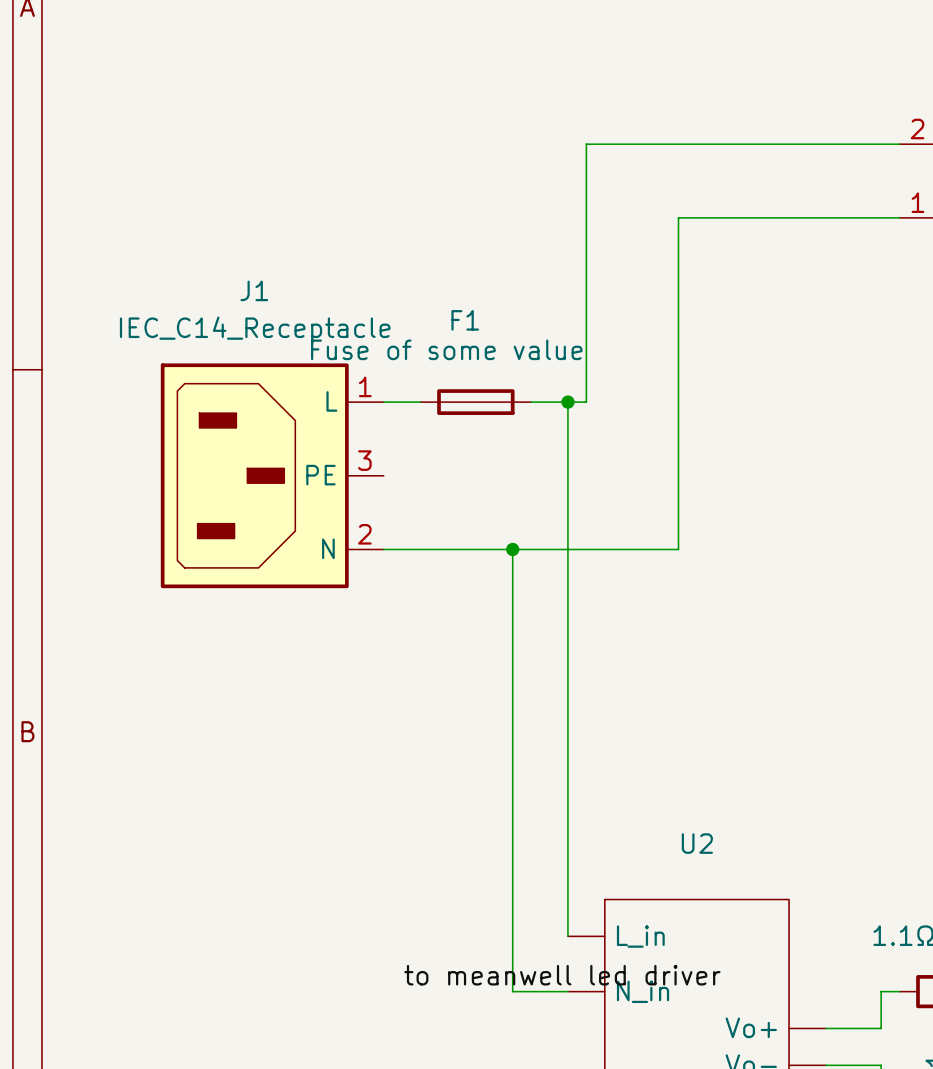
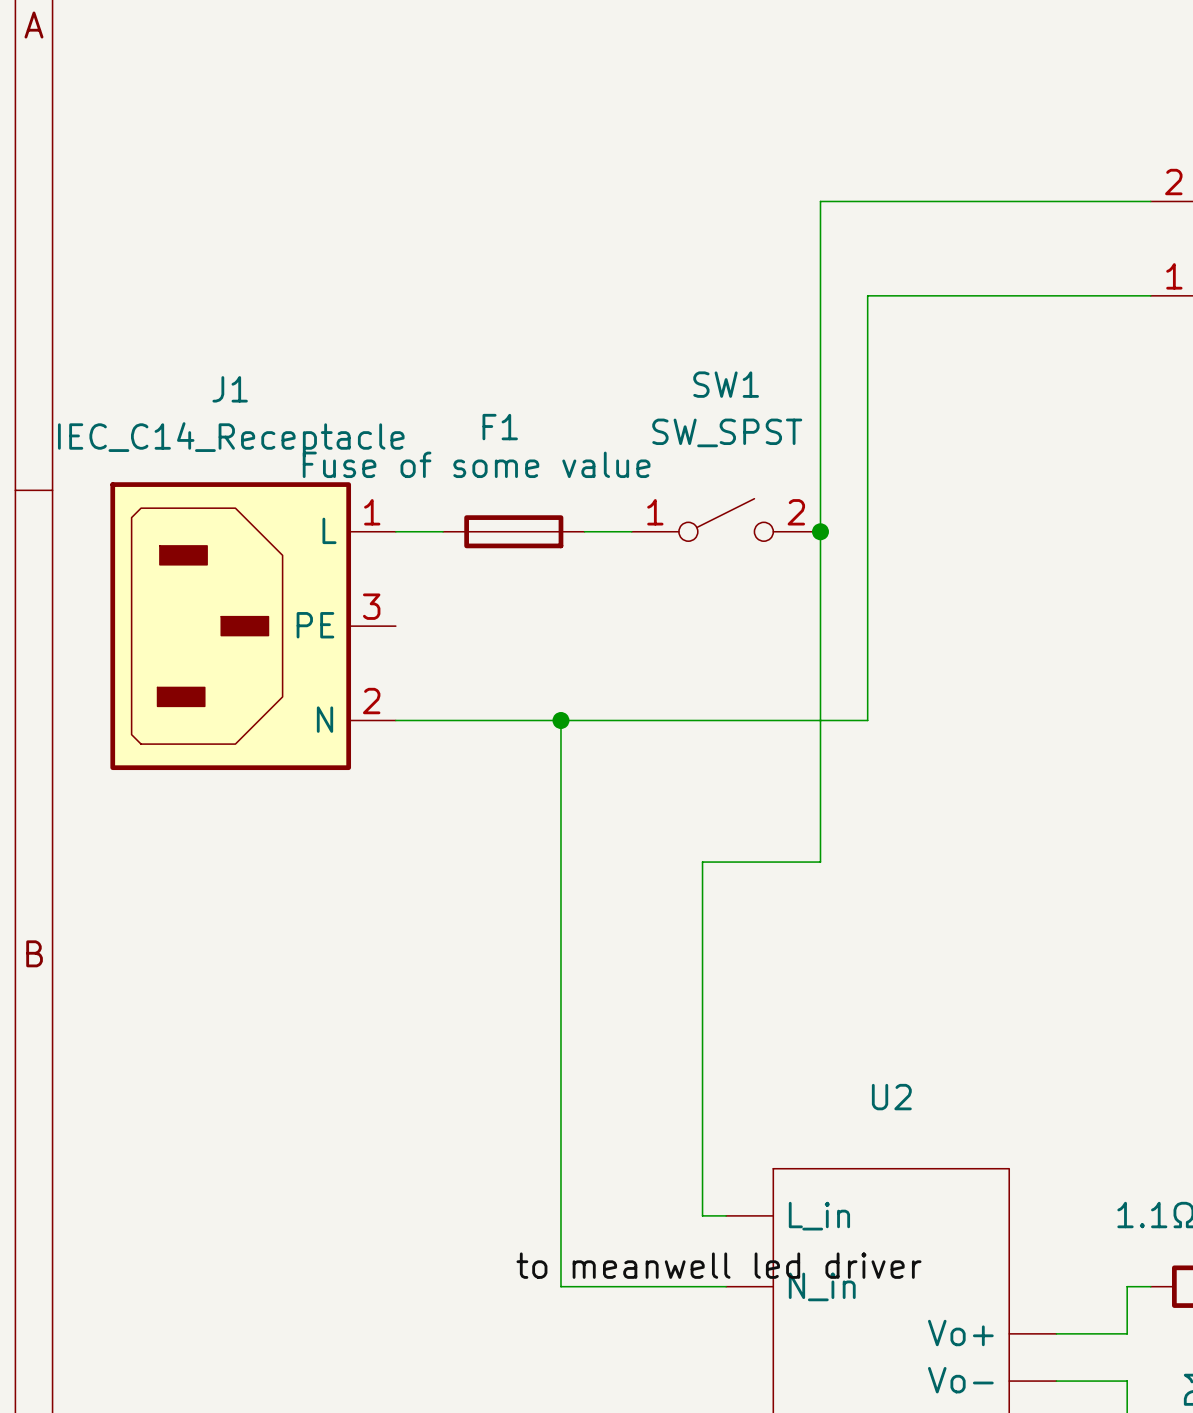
wire: (641, 144) (586, 144) (586, 402) (531, 402) -> none
SW1: none -> SW_SPST (726, 519)
F1 position: (475, 402) -> (513, 531)
wire: (567, 402) (567, 936) -> (820, 201) (820, 862) (702, 862) (702, 1215) (726, 1215)
junction position: (567, 402) -> (820, 531)
J1 position: (272, 475) -> (253, 626)
wire: (512, 549) (512, 991) -> (560, 720) (560, 1286) (655, 1286)
junction position: (512, 549) -> (560, 720)

